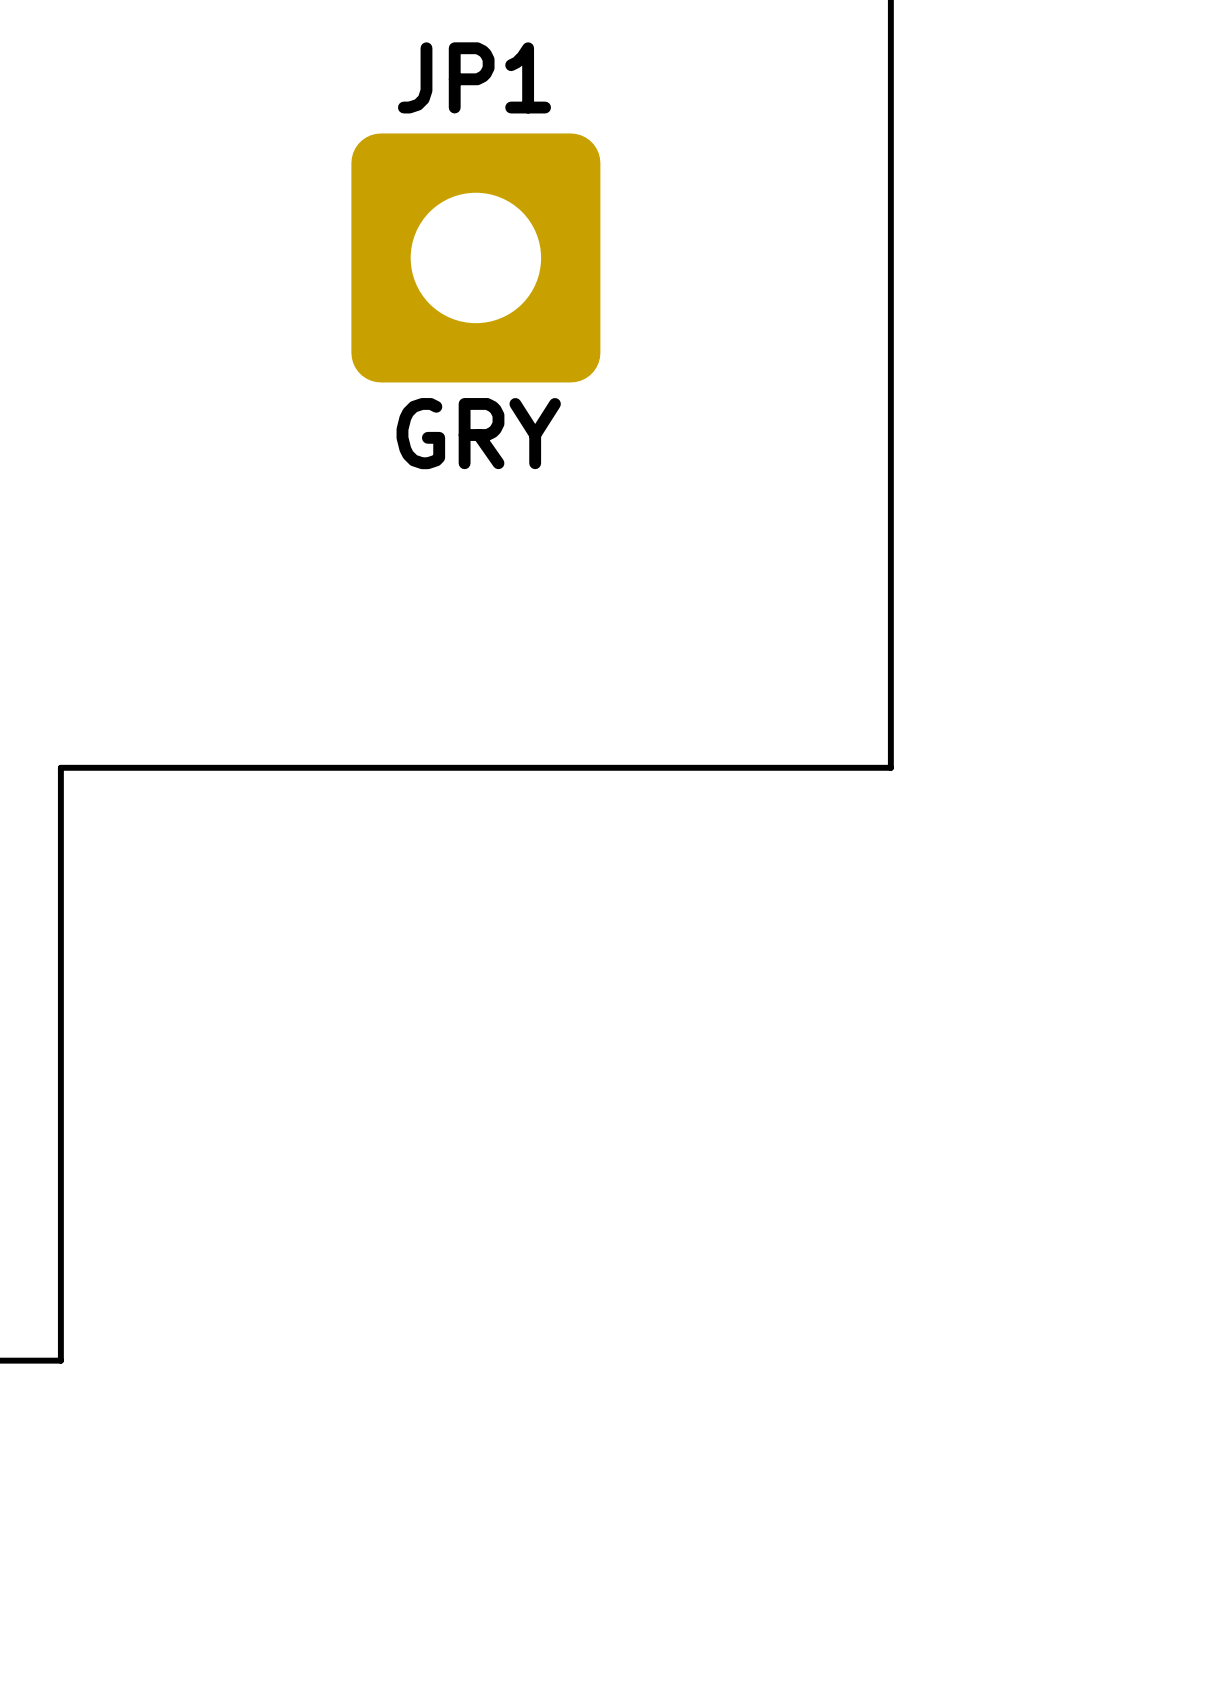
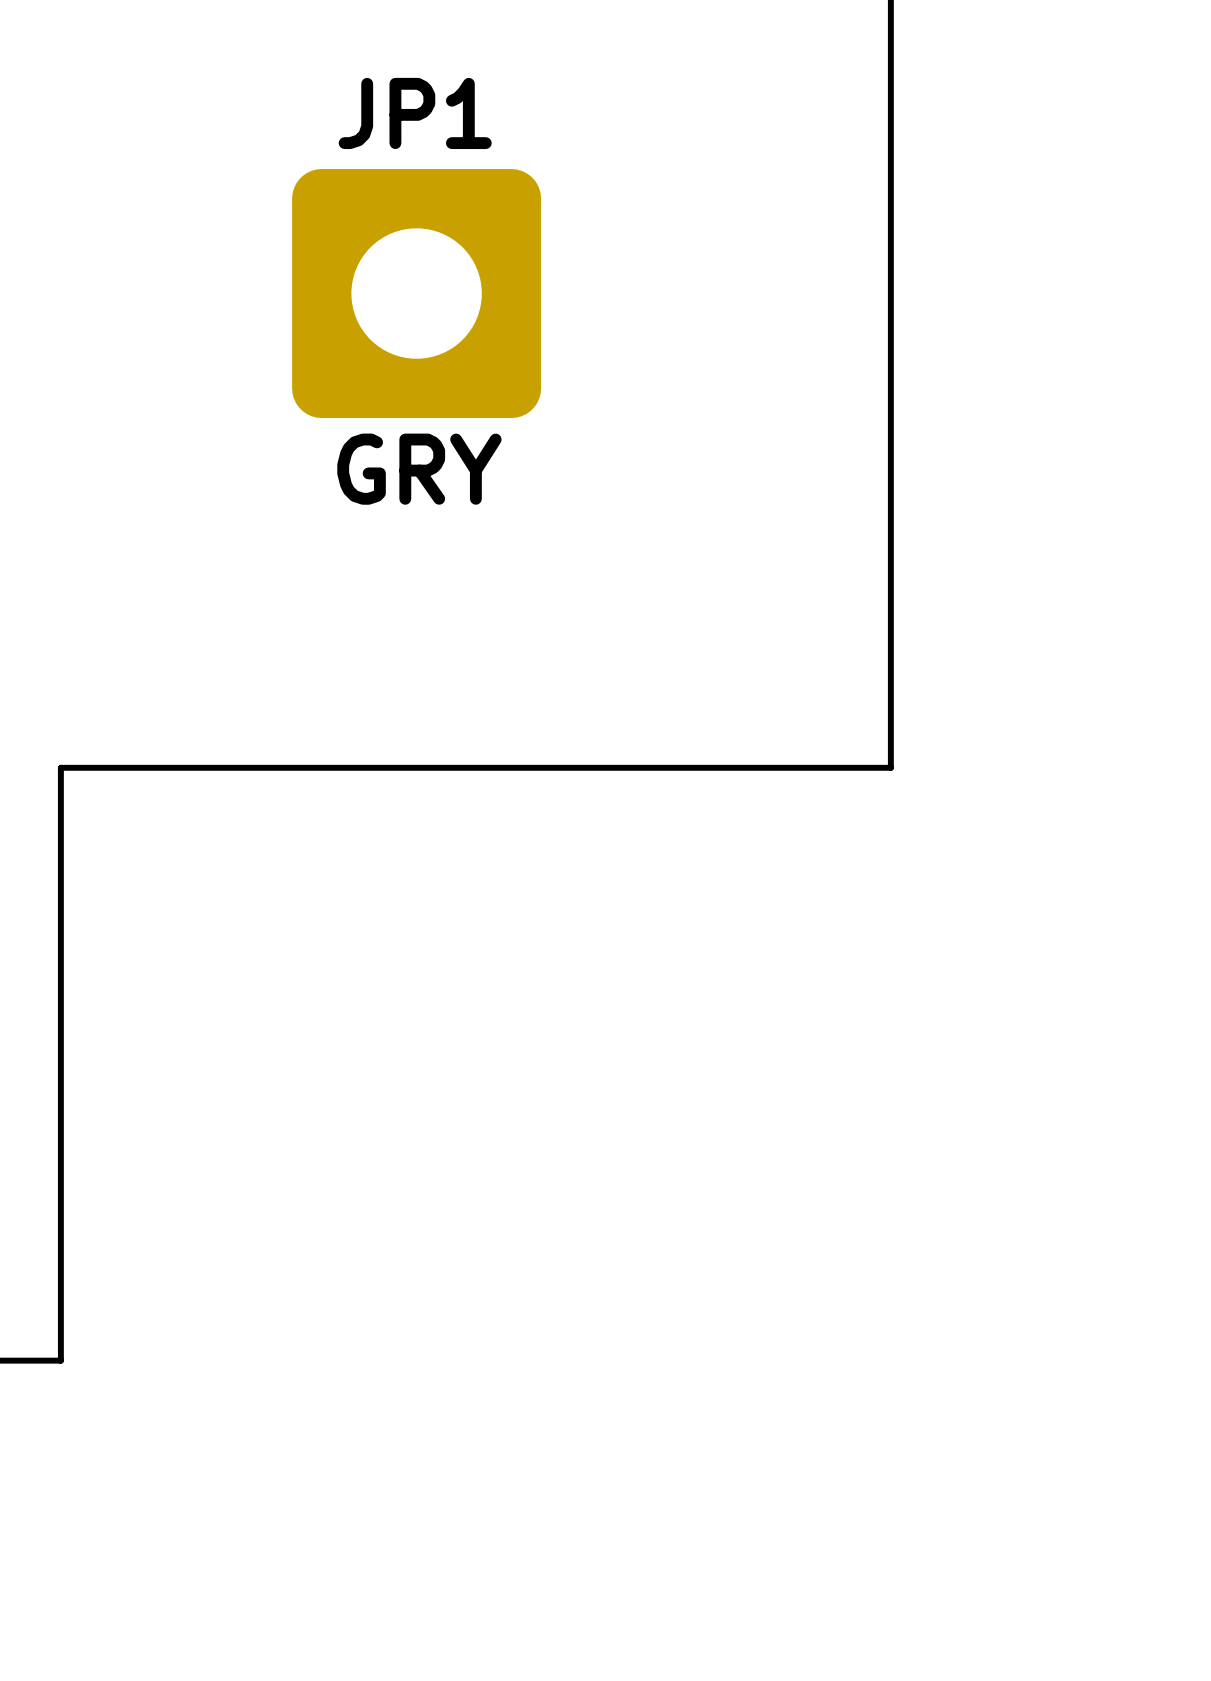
JP1 position: (475, 257) -> (416, 293)

